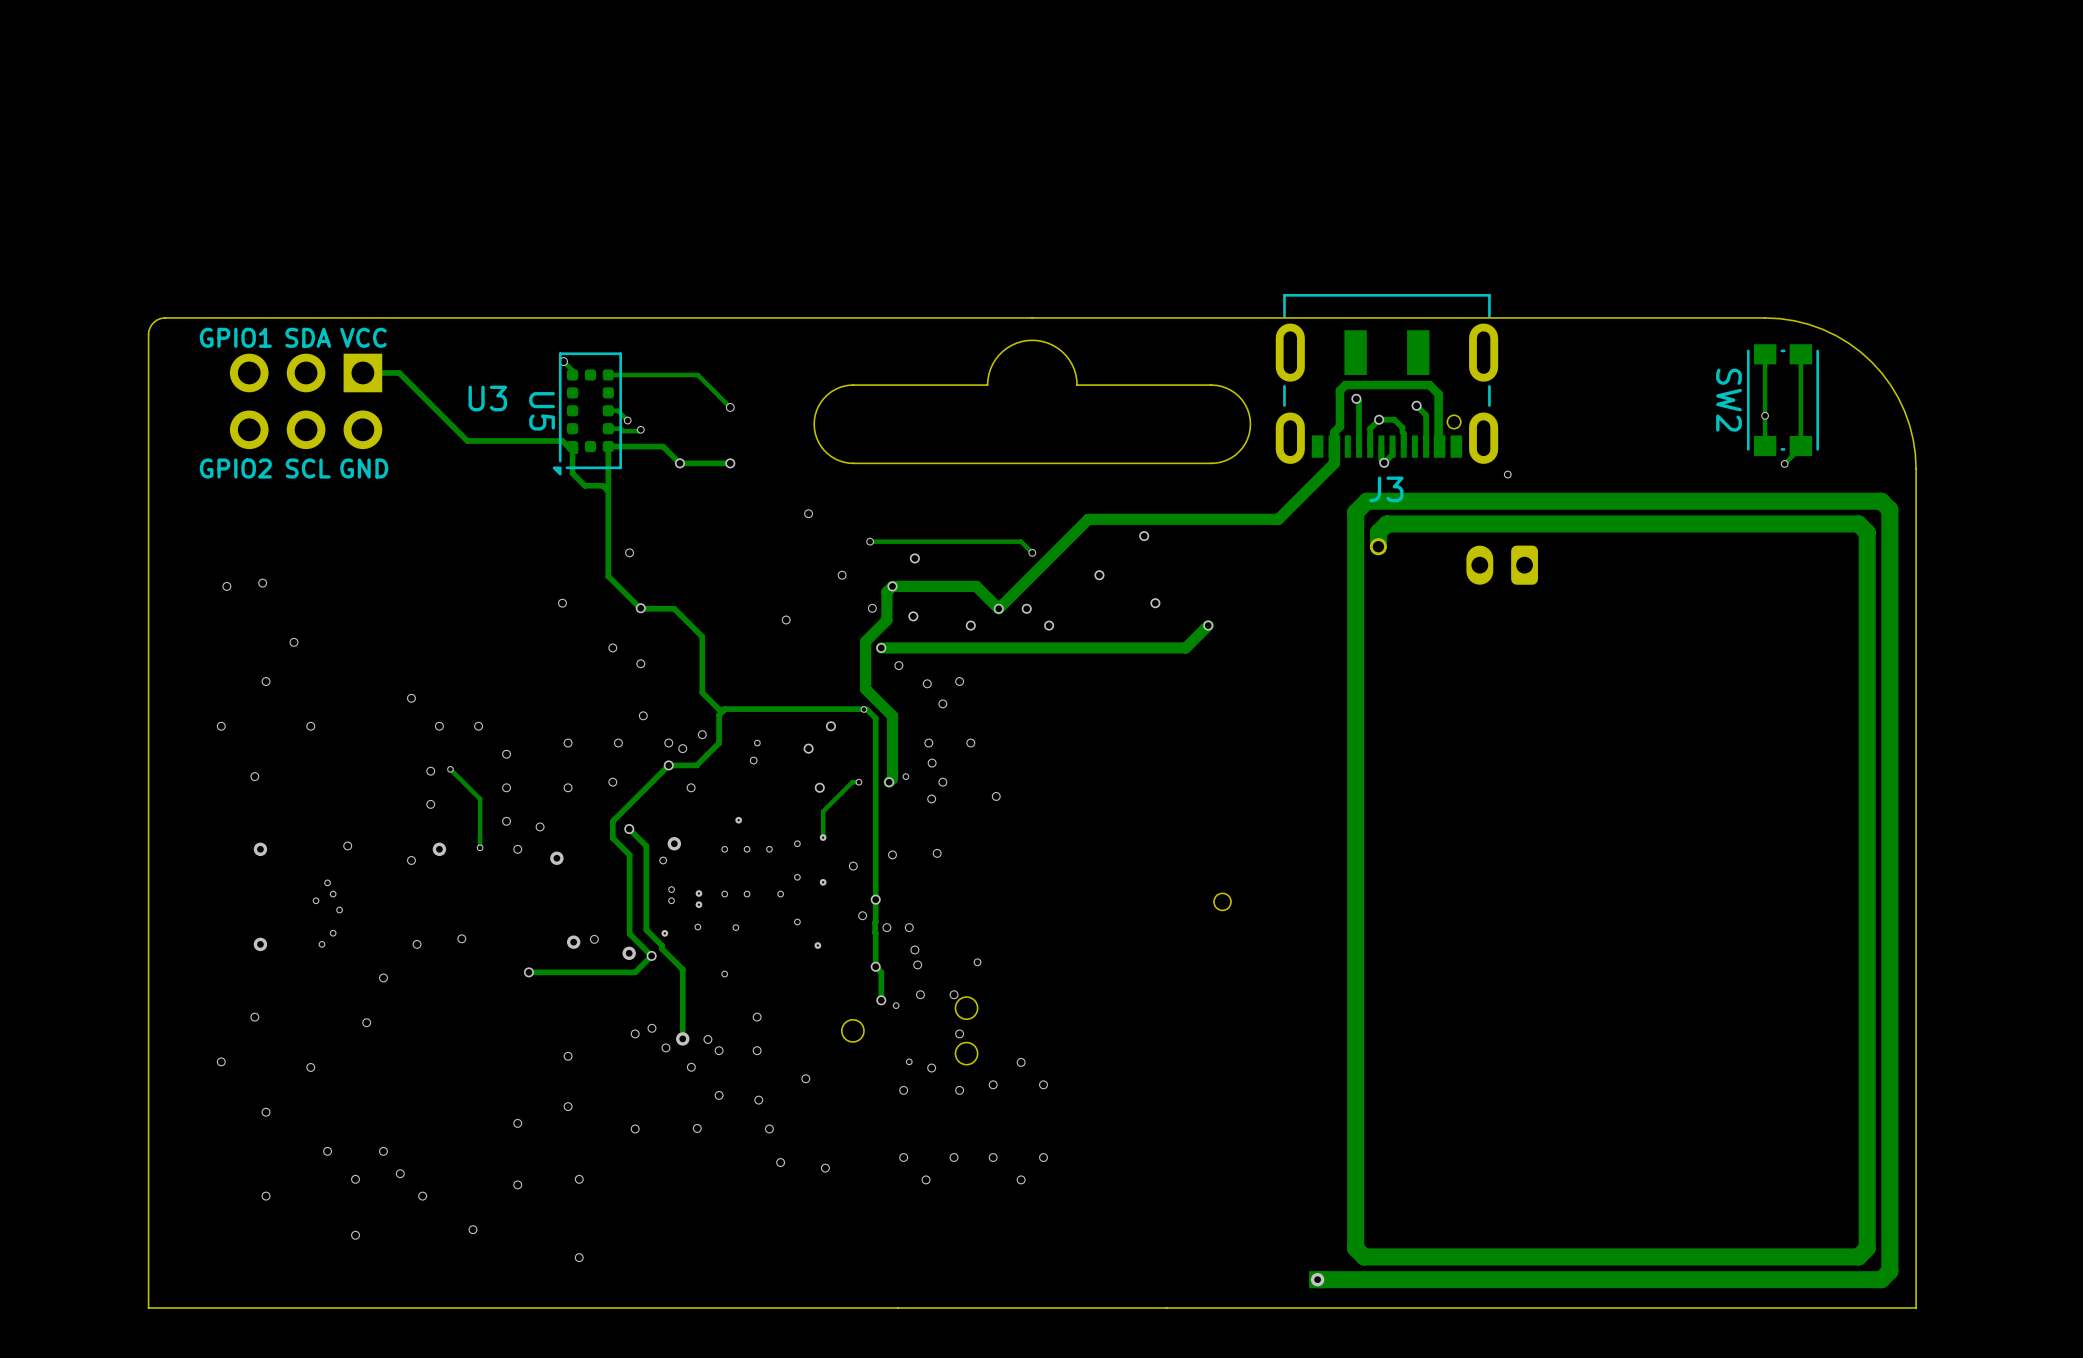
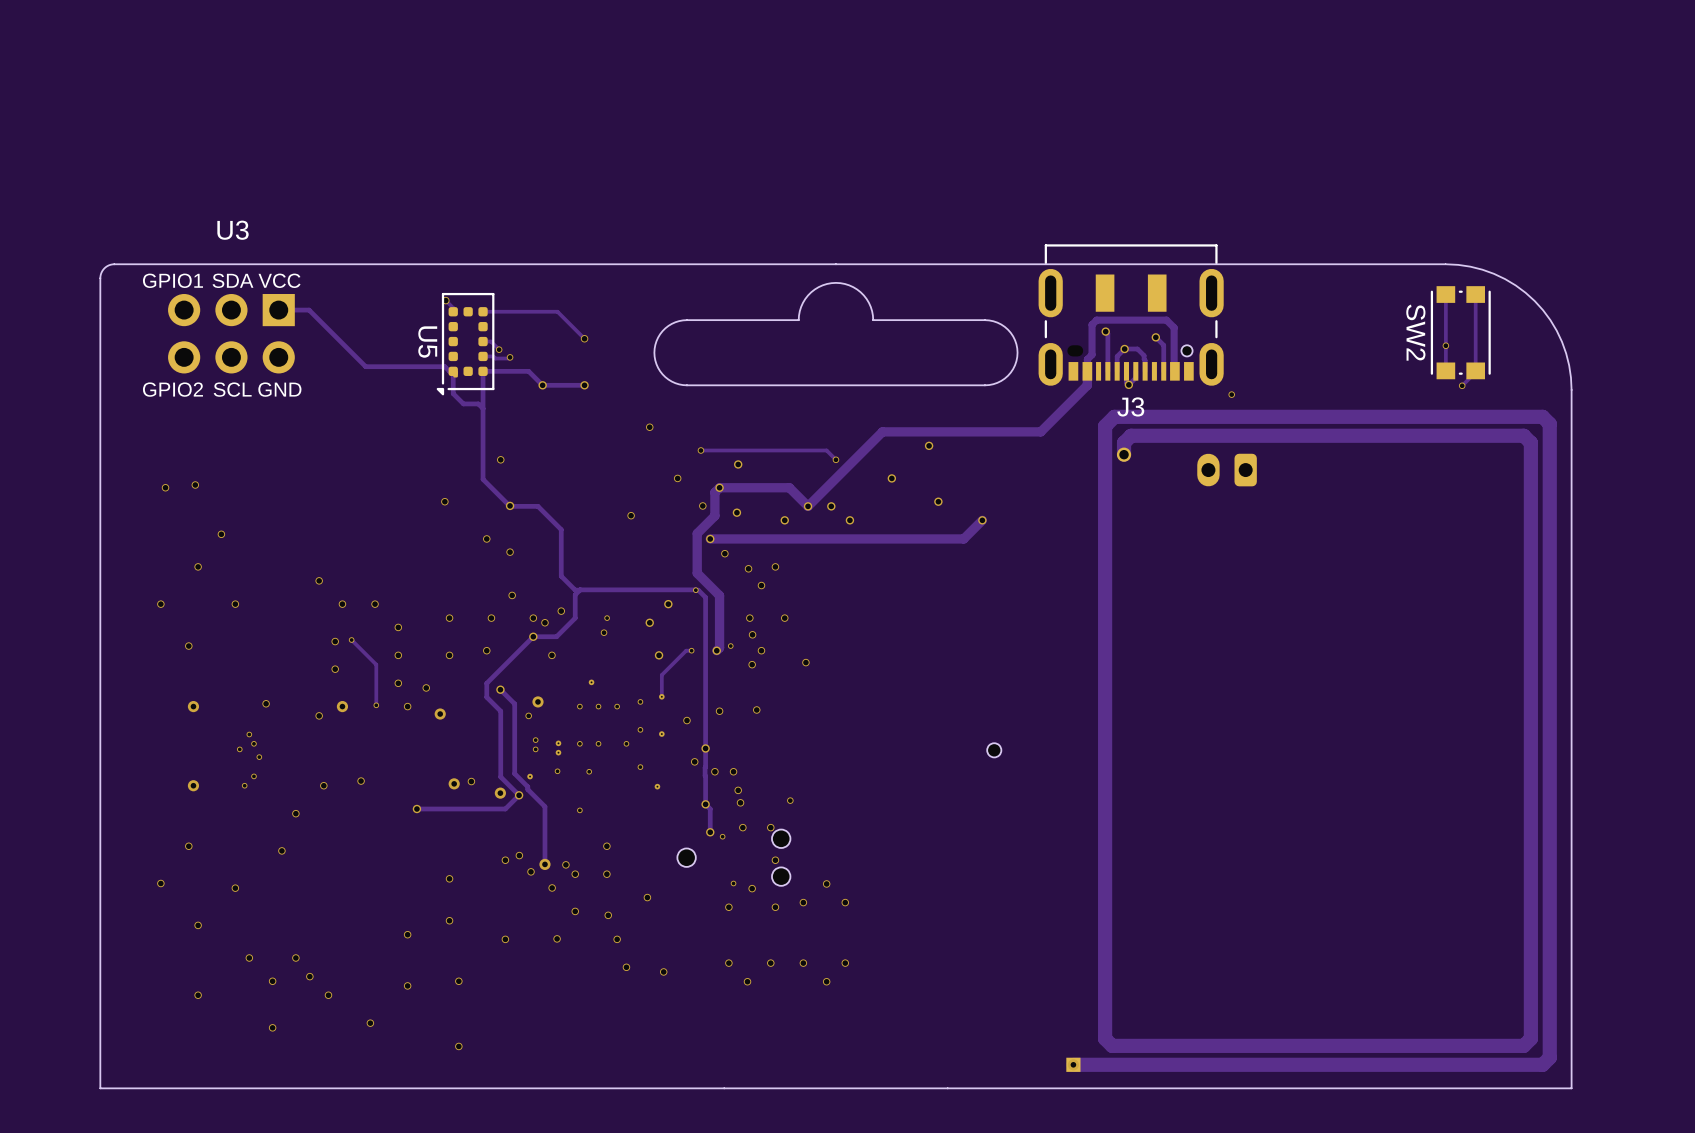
U3 name position: U3 (487, 398) -> U3 (233, 230)

